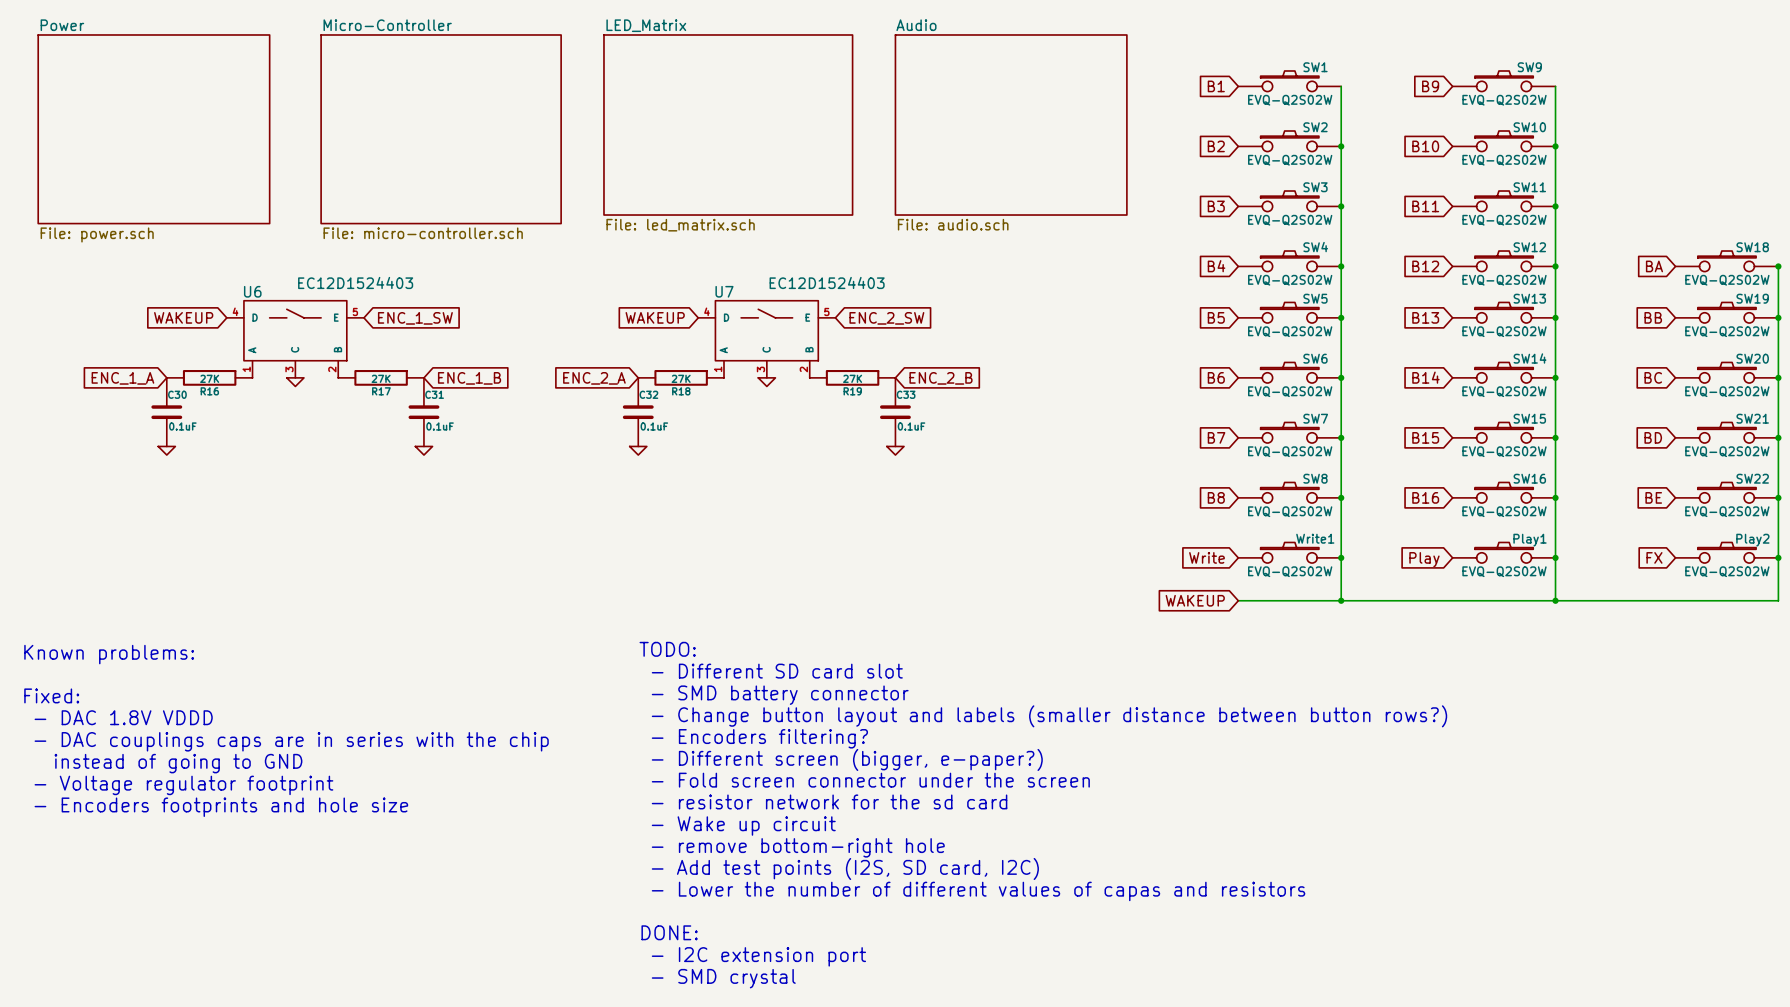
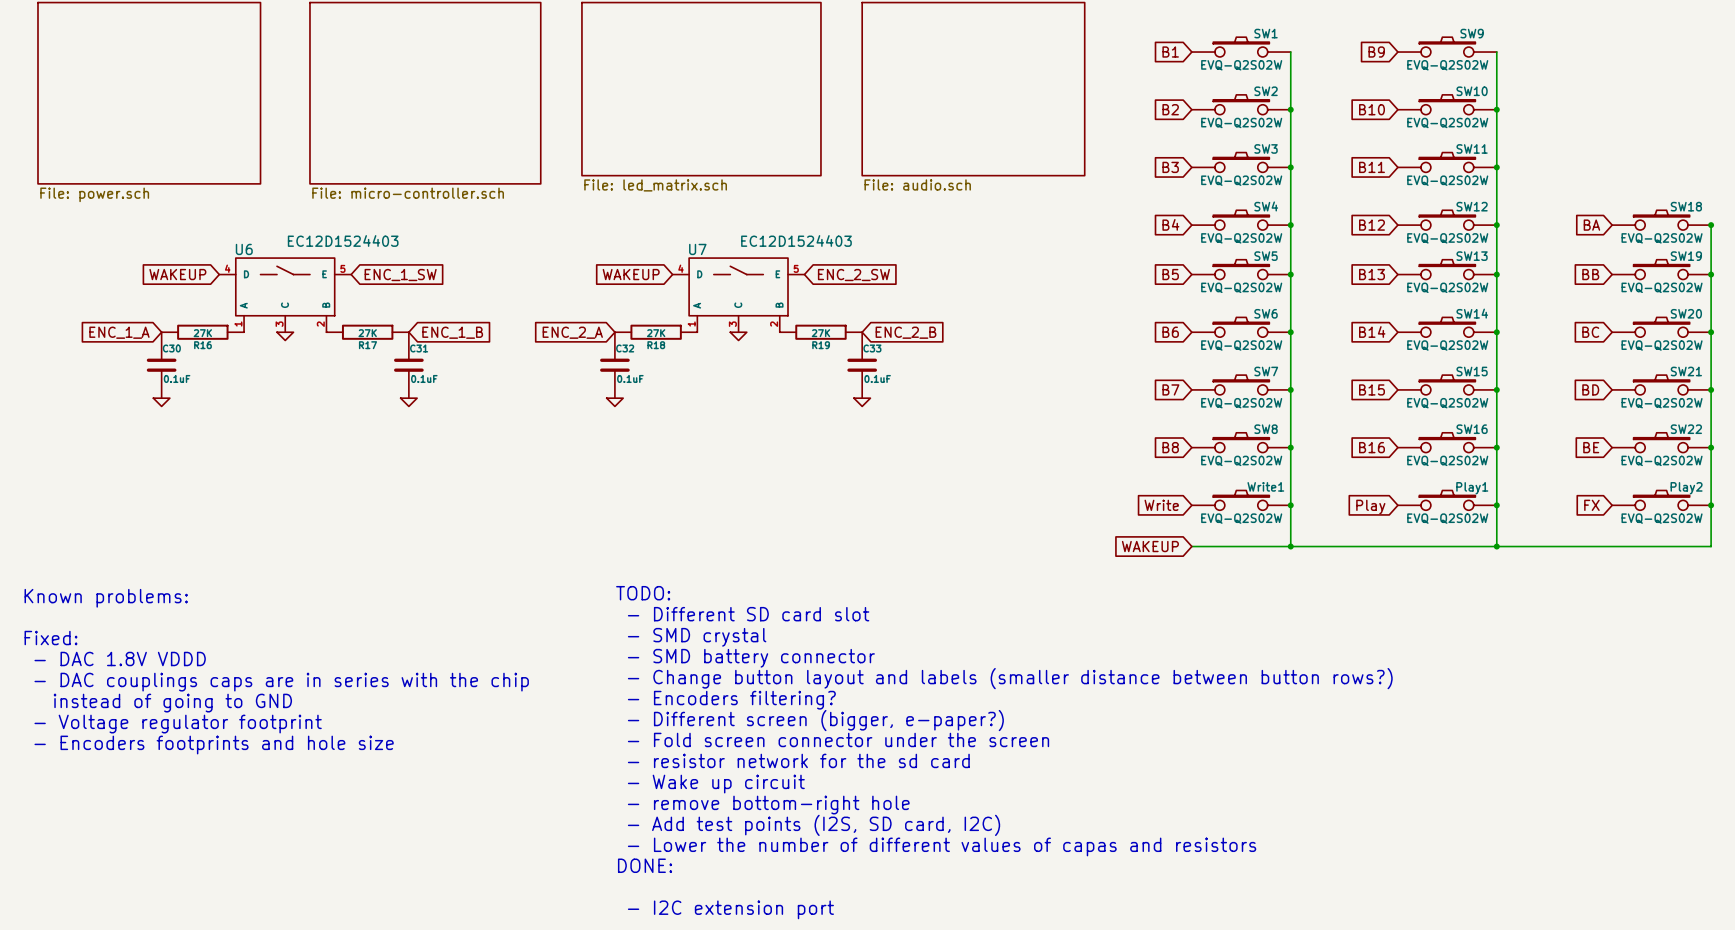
text: - SMD battery connector (780, 695) -> - SMD crystal (697, 637)
text: - Change button layout and labels (smaller distance between button rows?) (1049, 716) -> - SMD battery connector (751, 658)
text: - Encoders filtering? (759, 738) -> - Change button layout and labels (smaller distance between button rows?) (1010, 678)
text: - Different screen (bigger, e-paper?) (847, 759) -> - Encoders filtering? (731, 700)
text: - Fold screen connector under the screen (870, 780) -> - Different screen (bigger, e-paper?) (815, 720)
text: - resistor network for the sd card (829, 801) -> - Fold screen connector under the screen (838, 739)
text: - Wake up circuit (743, 826) -> - resistor network for the sd card (798, 760)
text: - remove bottom-right hole (798, 847) -> - Wake up circuit (716, 784)
text: - Add test points (I2S, SD card, I2C) (845, 868) -> - remove bottom-right hole (768, 805)
text: - Lower the number of different values of capas and resistors (978, 891) -> - Add test points (I2S, SD card, I2C) (814, 825)
text: none -> - Lower the number of different values of capas and resistors (942, 846)
text: - I2C extension port (758, 956) -> none
text: - SMD crystal (723, 978) -> - I2C extension port (730, 909)

